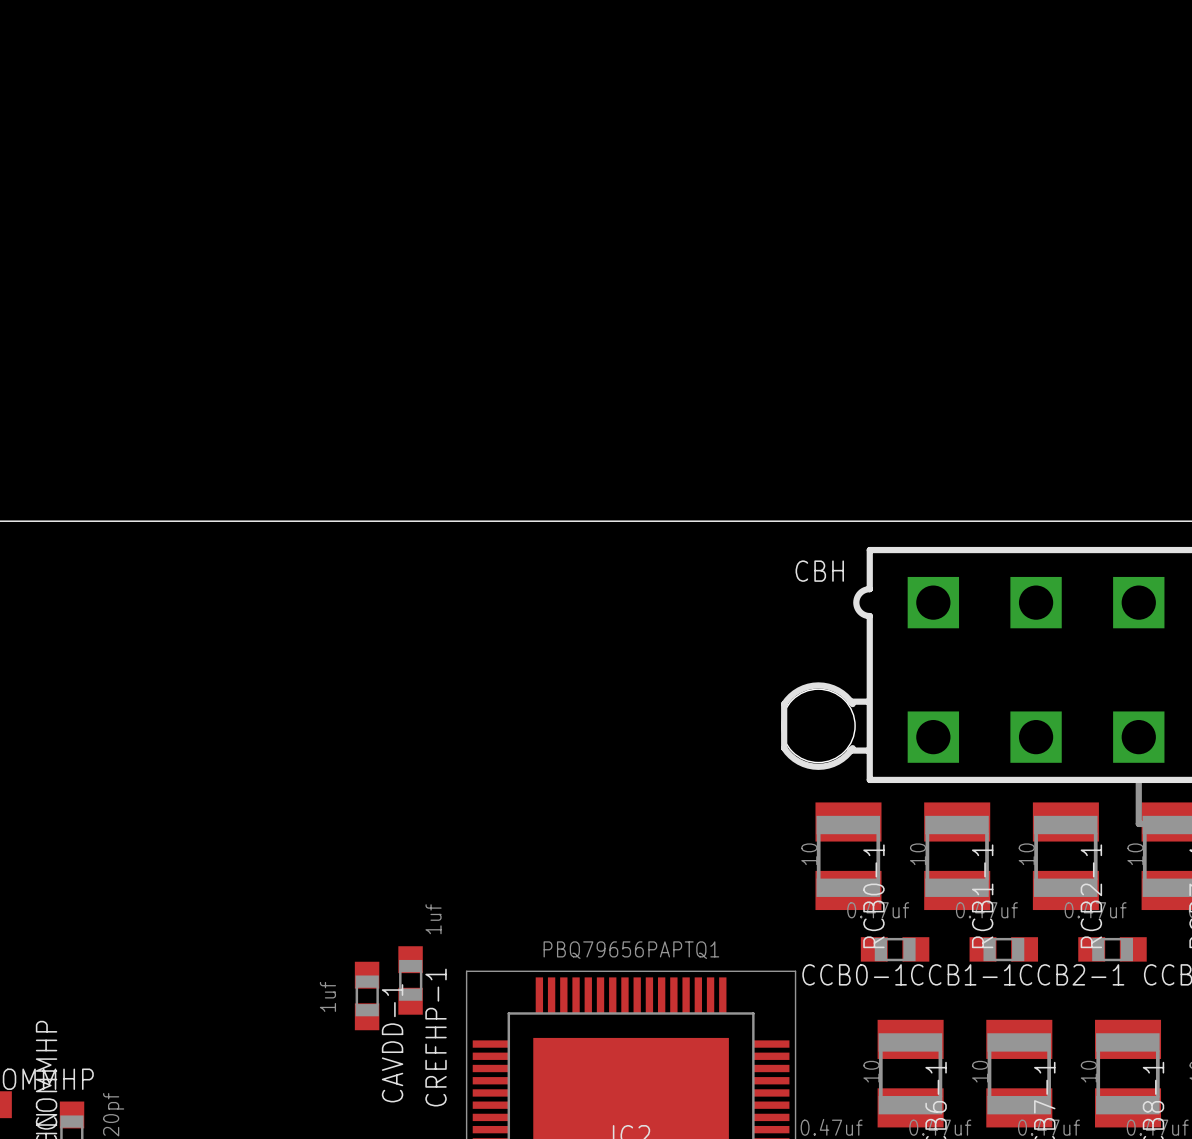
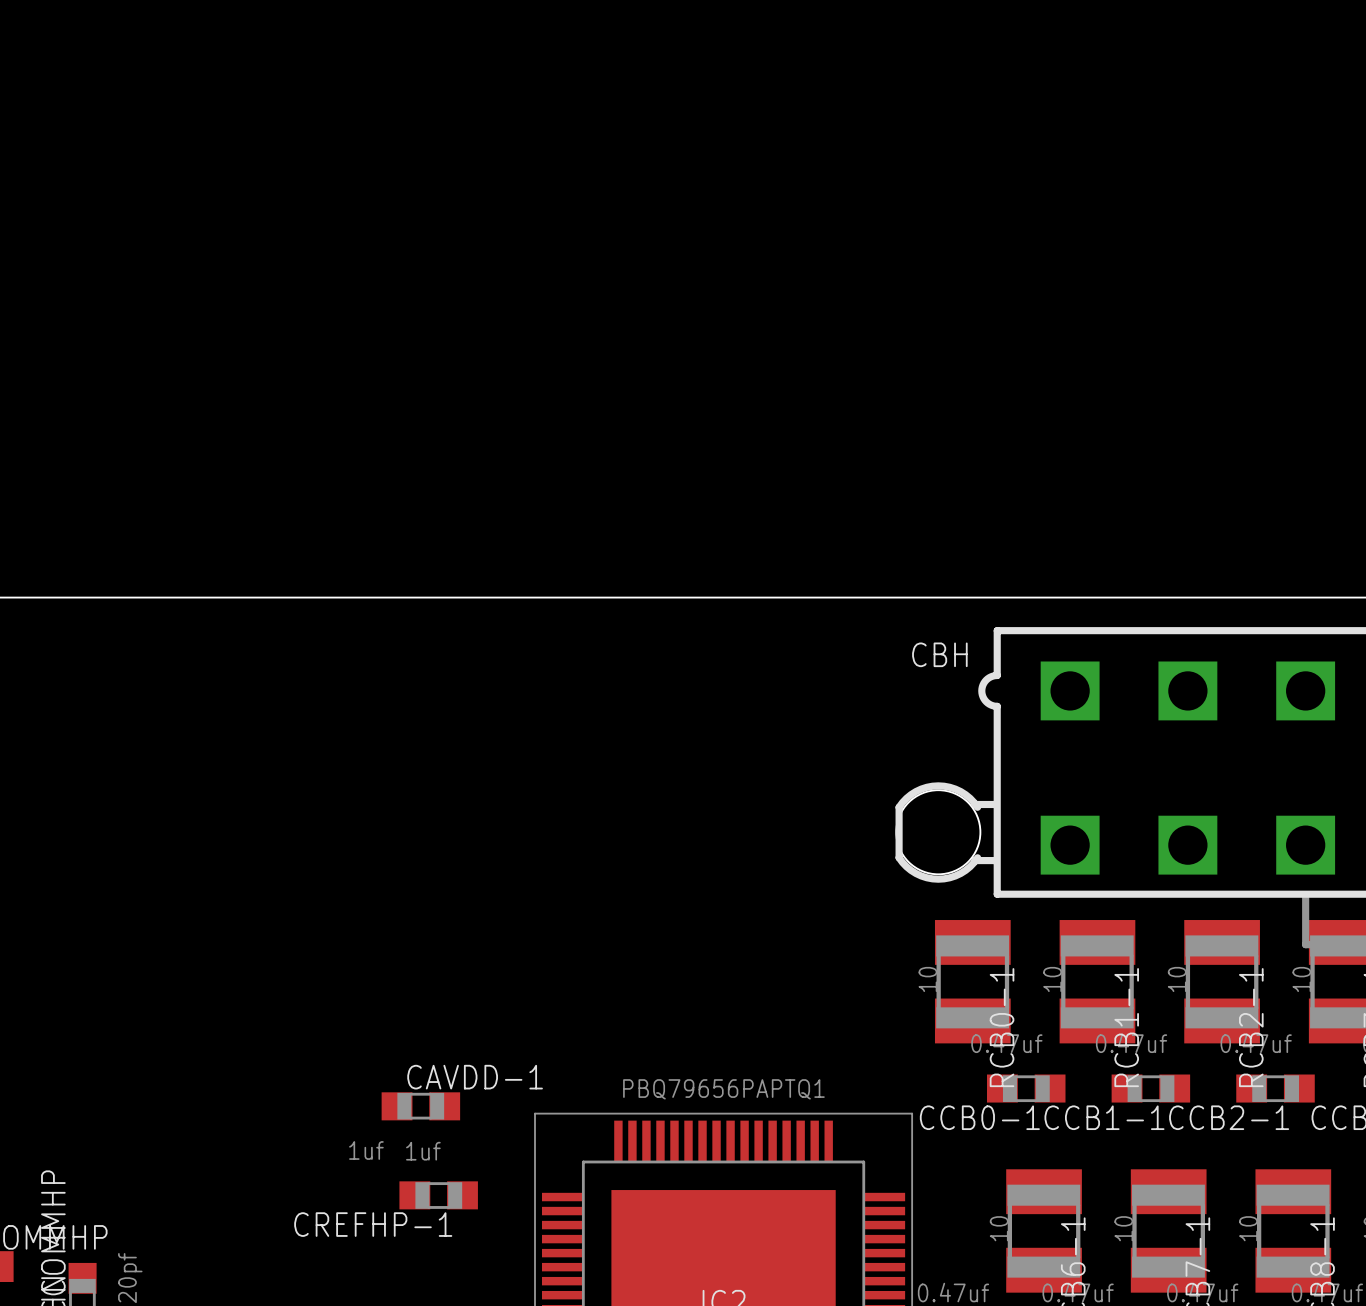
CREFHP-1 value position: 1uf (433, 919) -> 1uf (366, 1150)
CREFHP-1 rotation: 0° (410, 980) -> 90° clockwise (438, 1195)
CREFHP-1 position: (410, 980) -> (438, 1195)
CAVDD-1 rotation: 0° (367, 995) -> 90° clockwise (420, 1106)
CAVDD-1 value position: 1uf (327, 996) -> 1uf (423, 1151)
CAVDD-1 name position: CAVDD-1 (392, 1043) -> CAVDD-1 (475, 1077)

